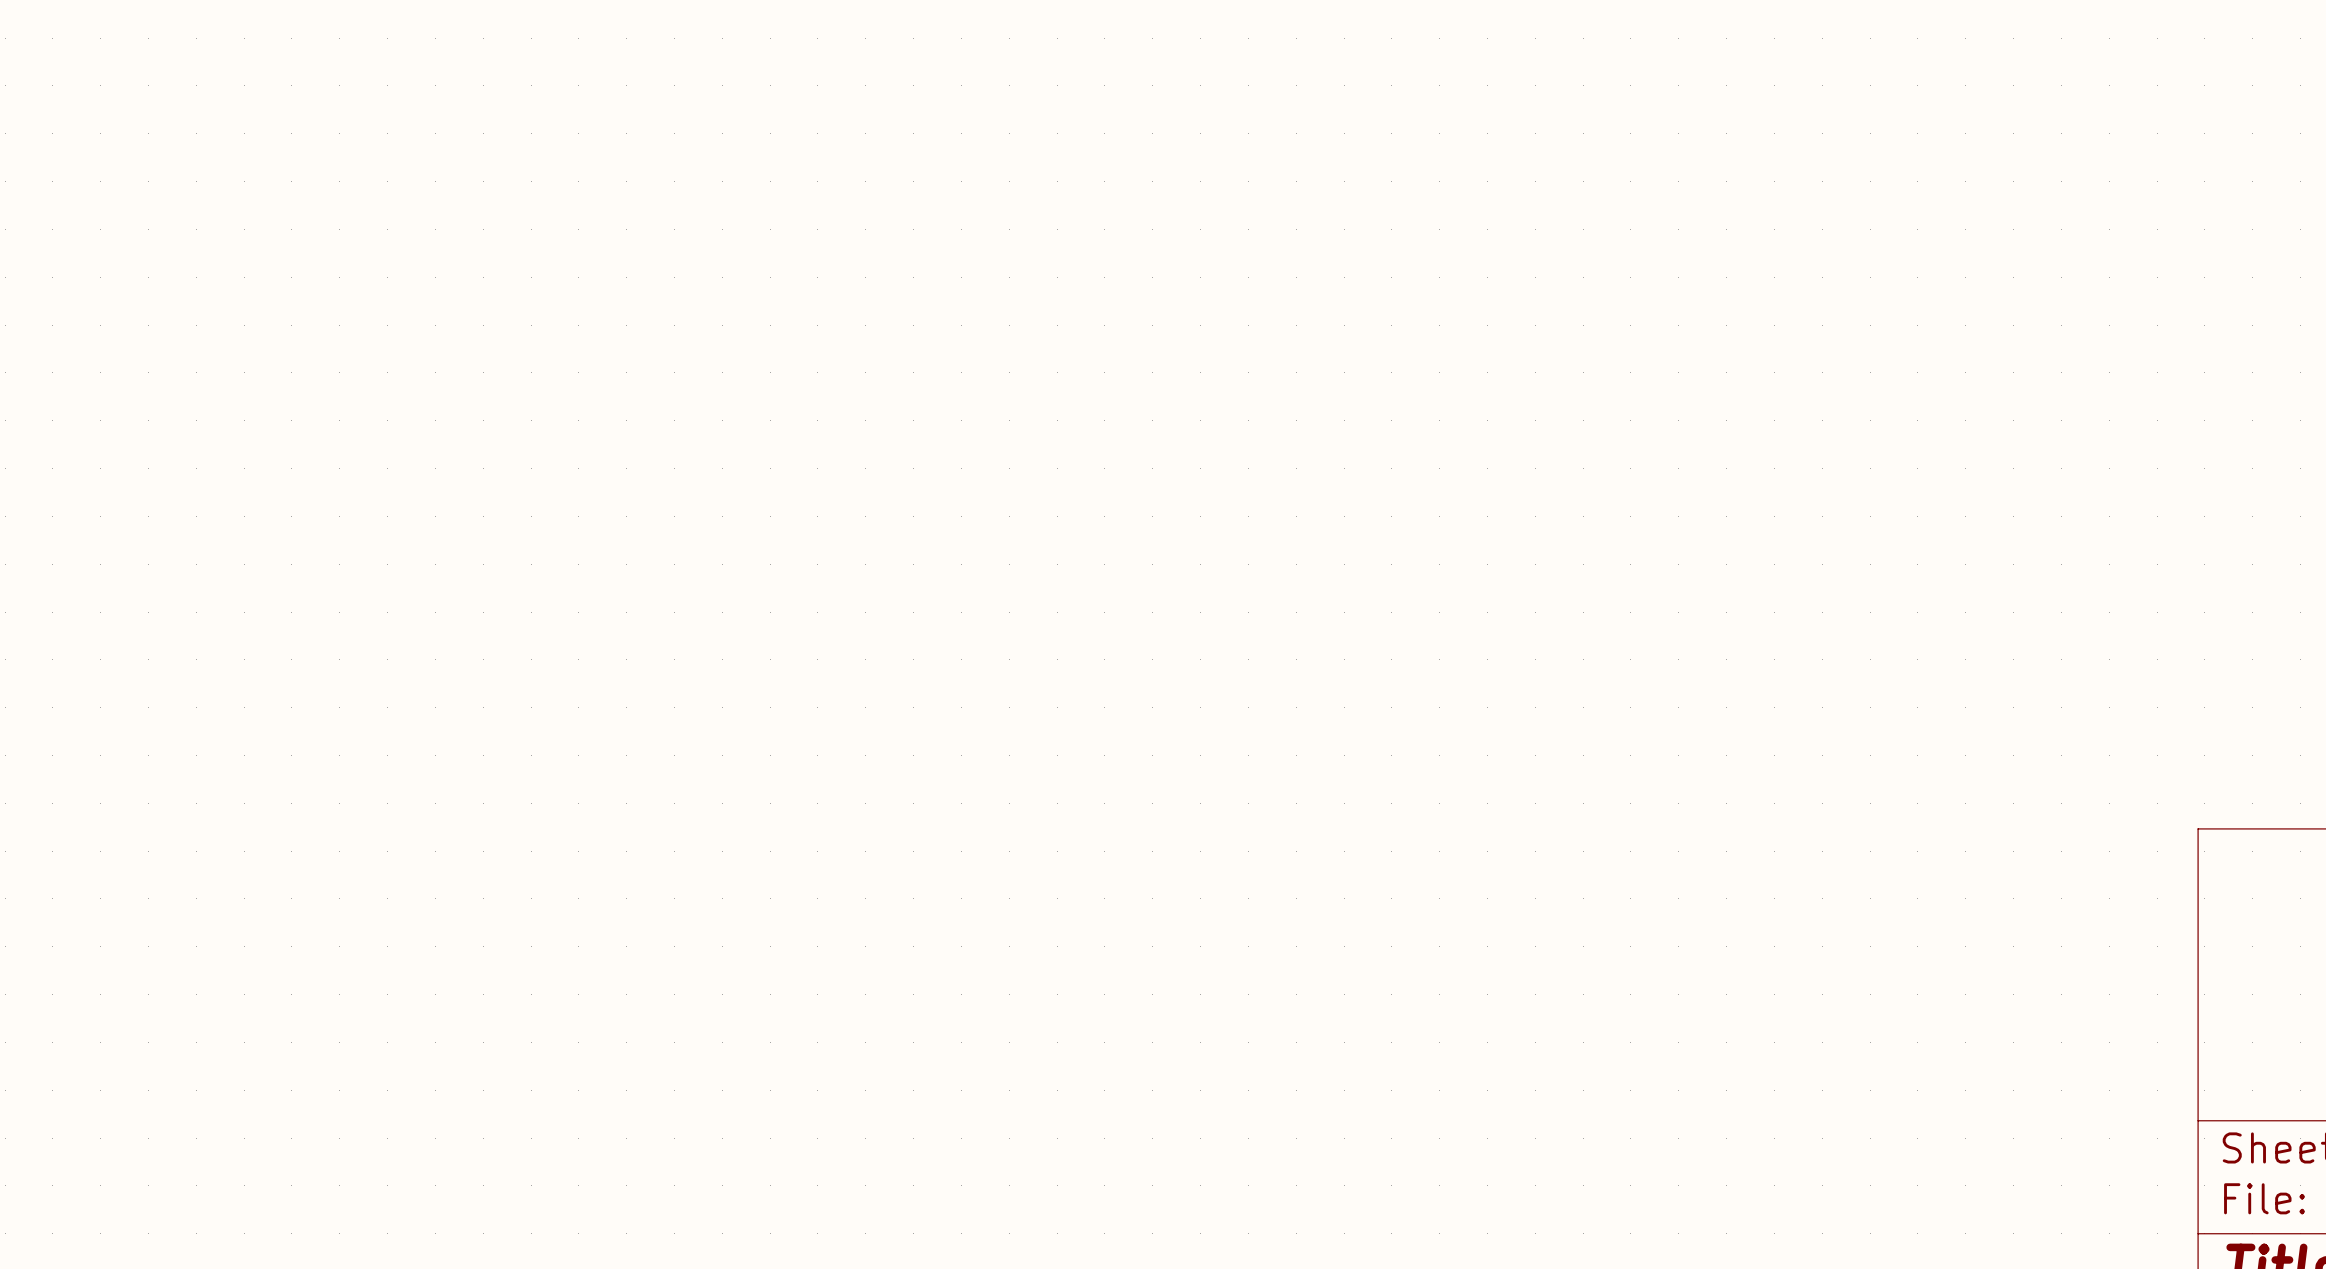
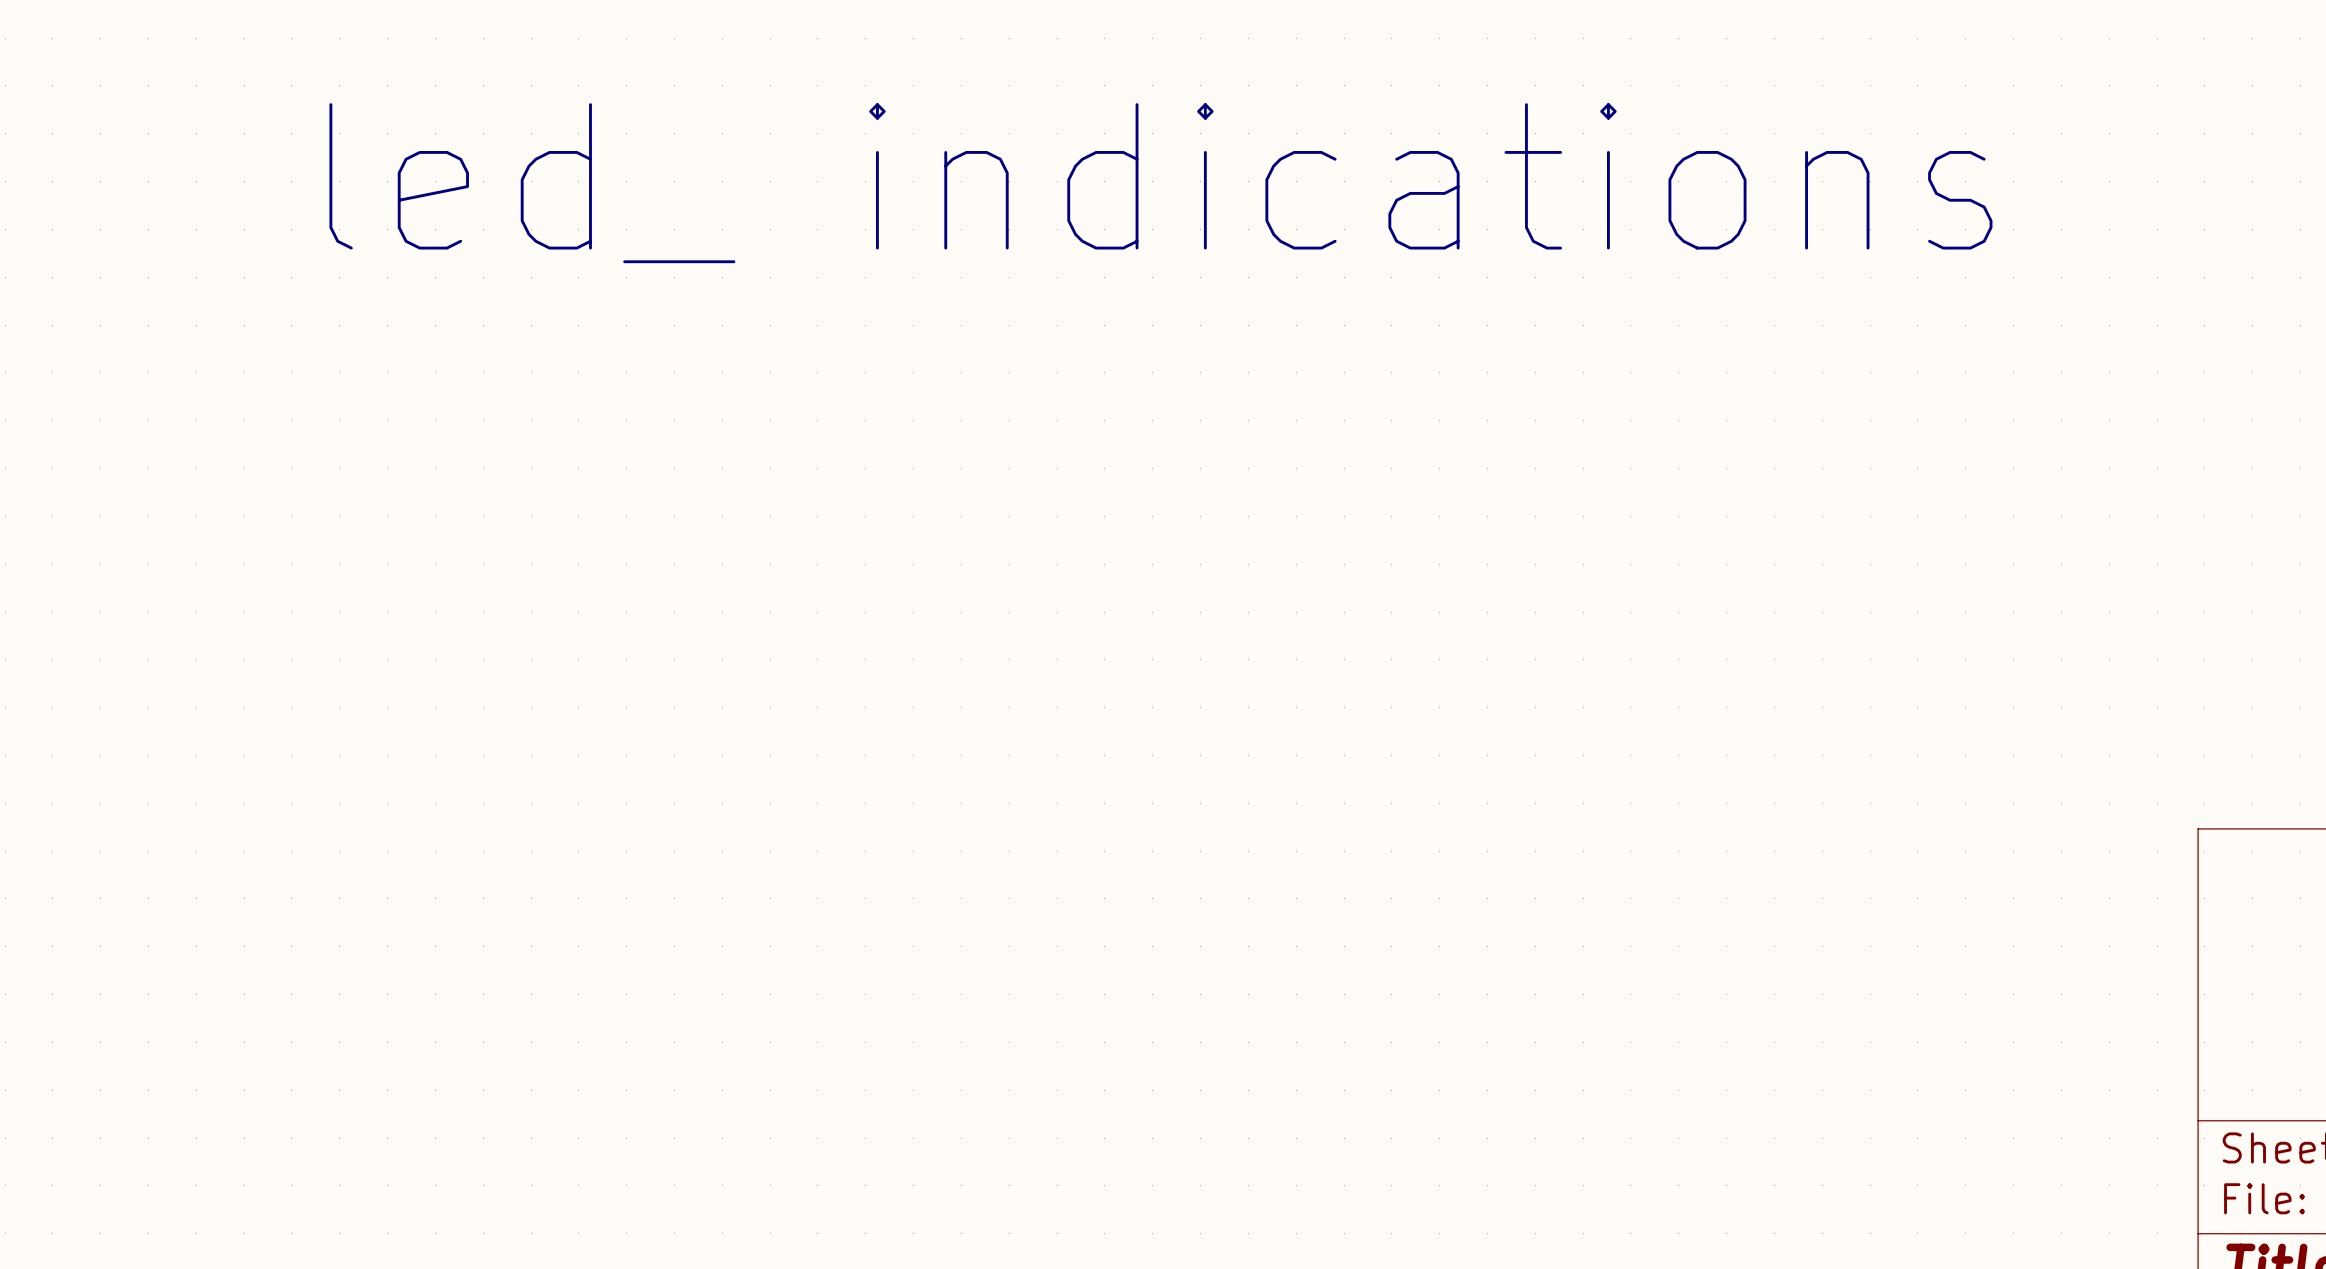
text: none -> led_ indications (1160, 183)

